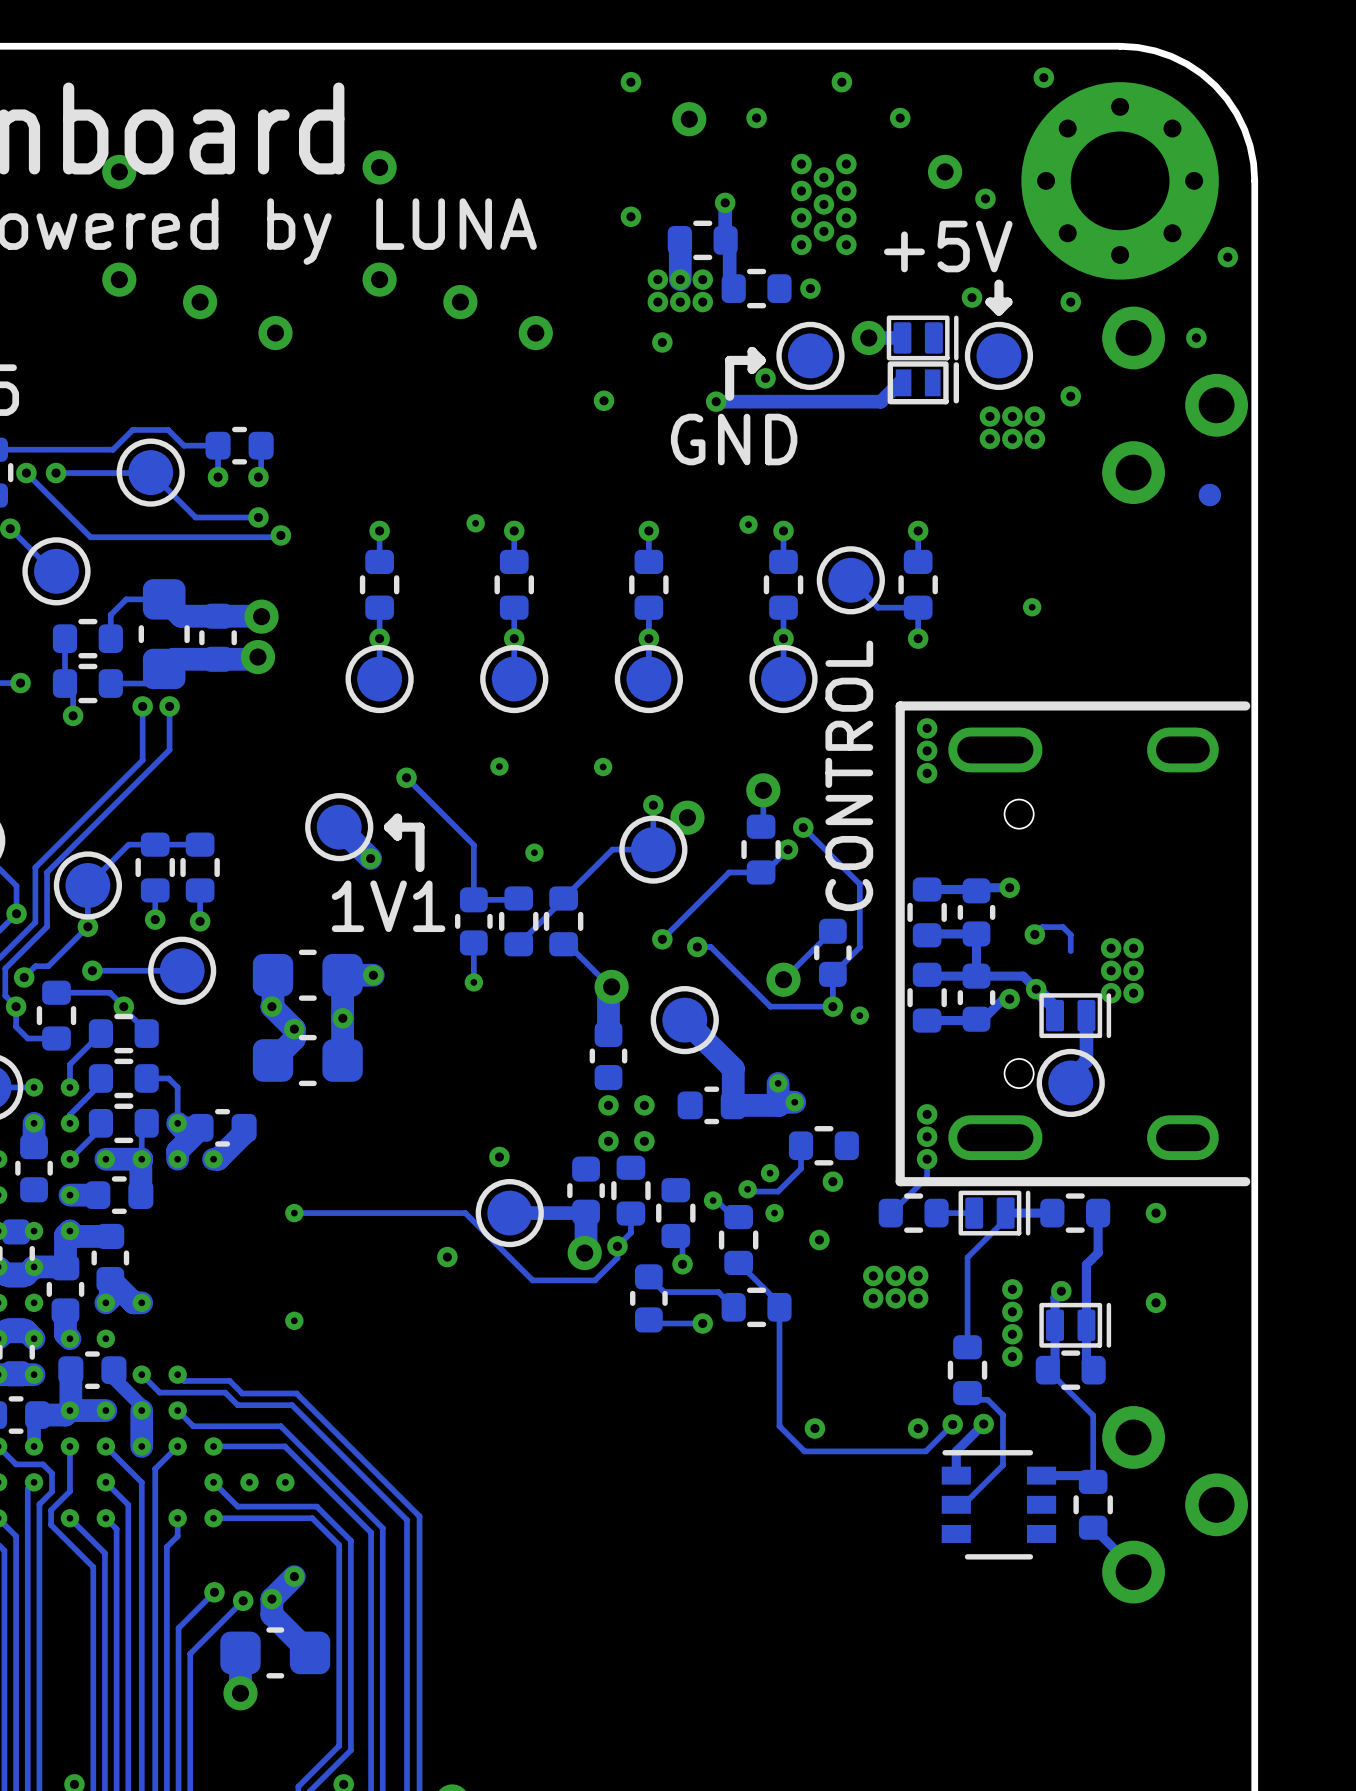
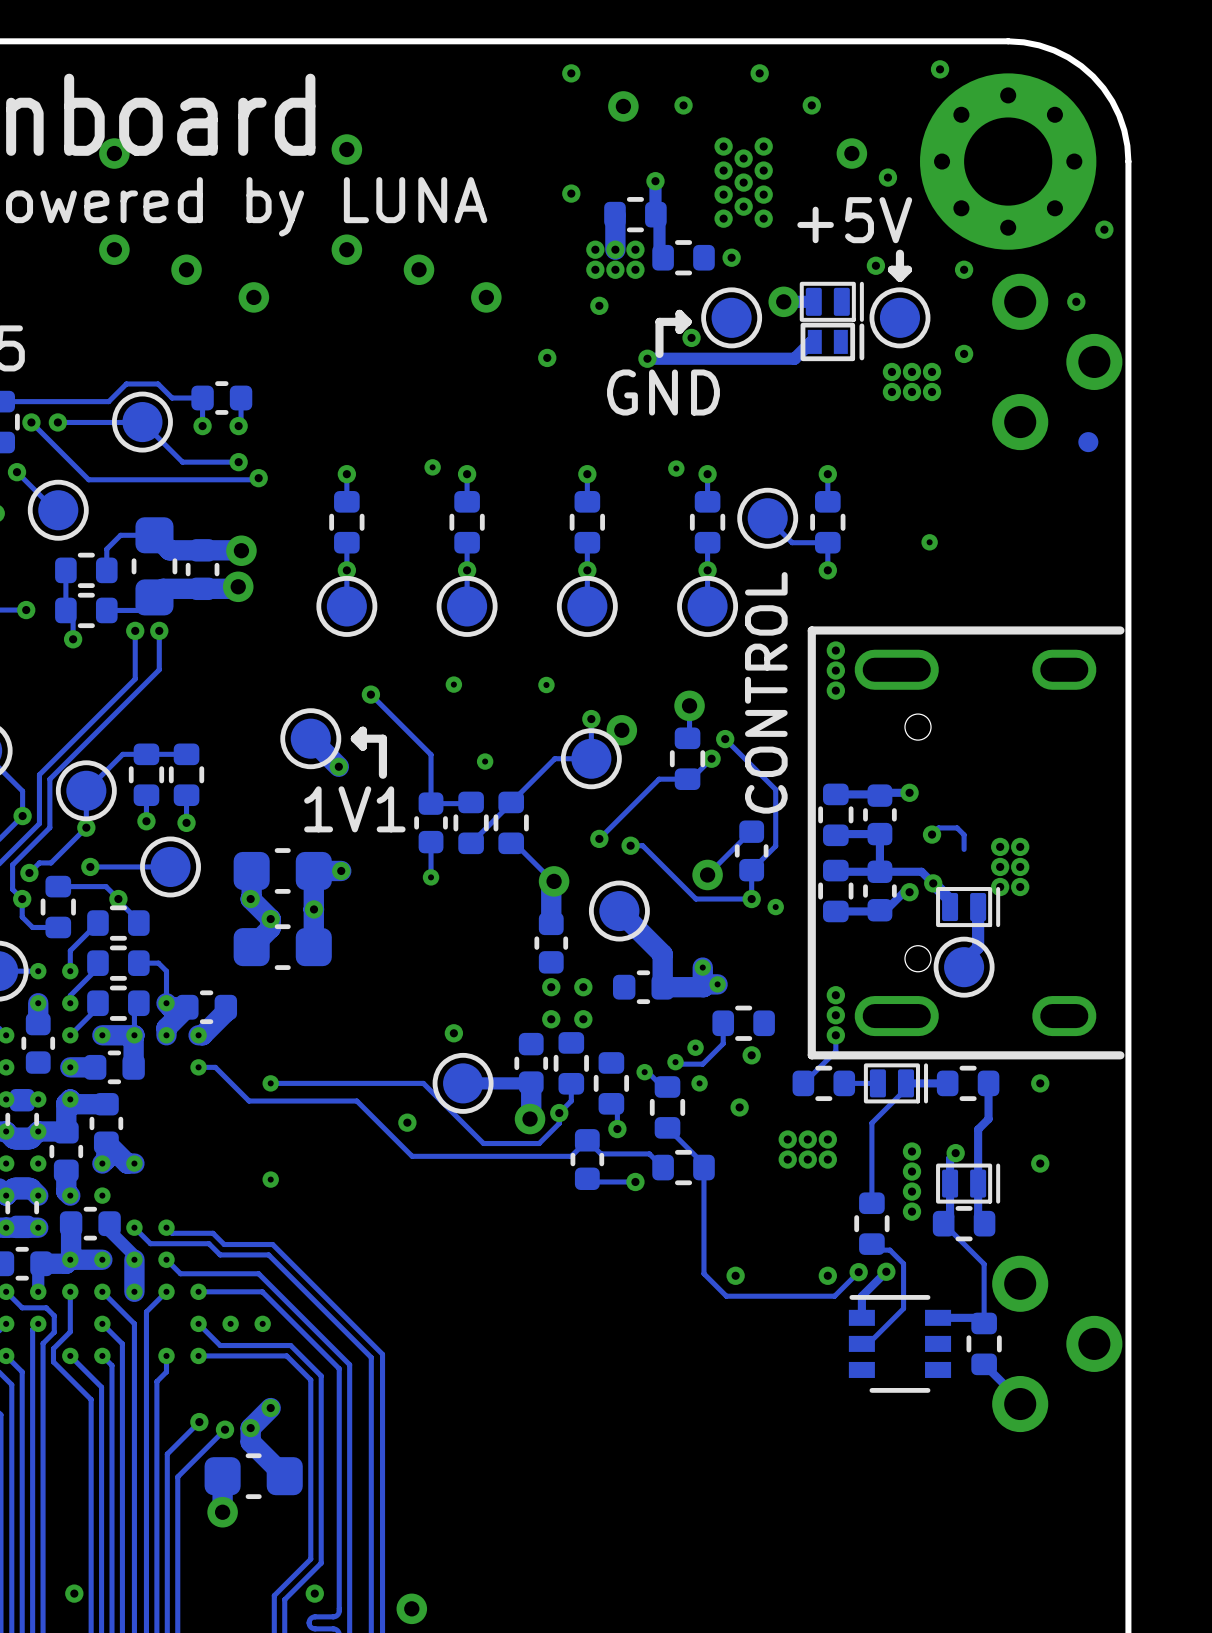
track: none -> (198, 1067) (215, 1067) (249, 1101) (356, 1101) (412, 1156) (571, 1156) (587, 1140)
via: none -> (198, 1067)

